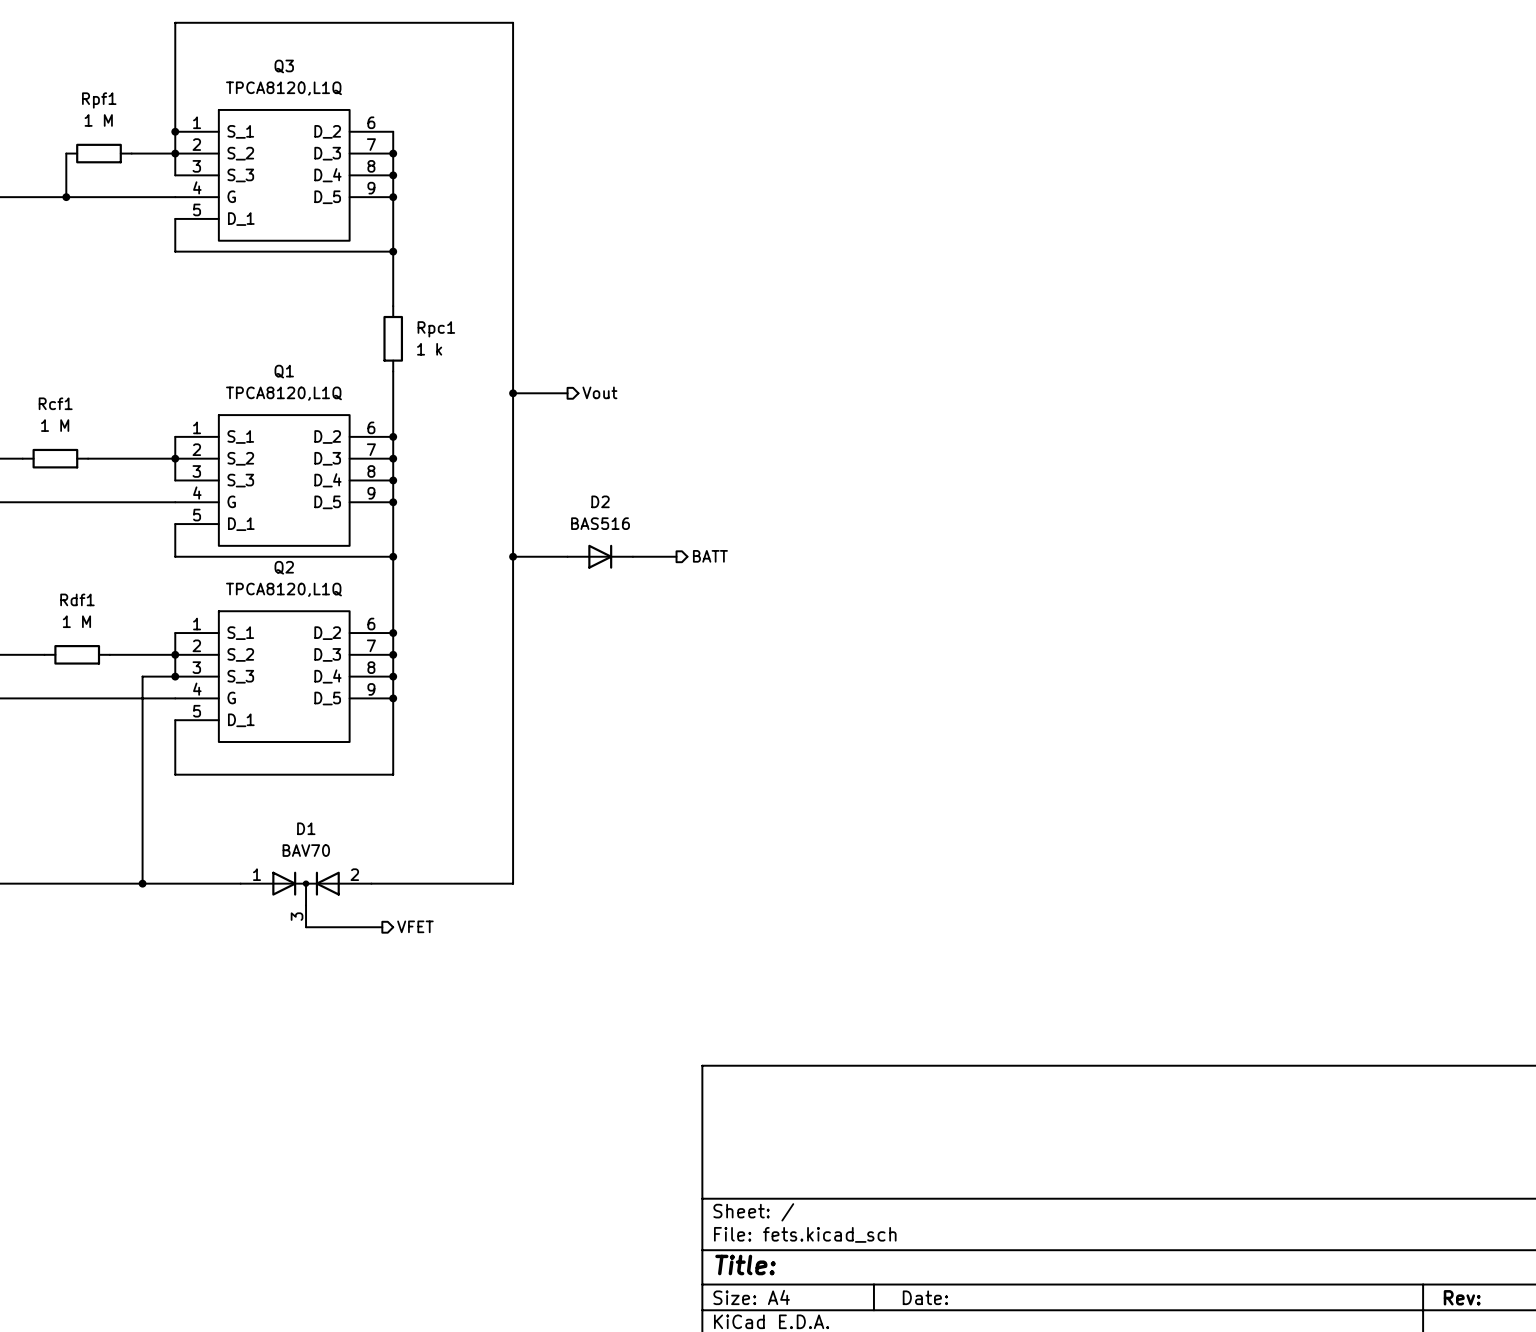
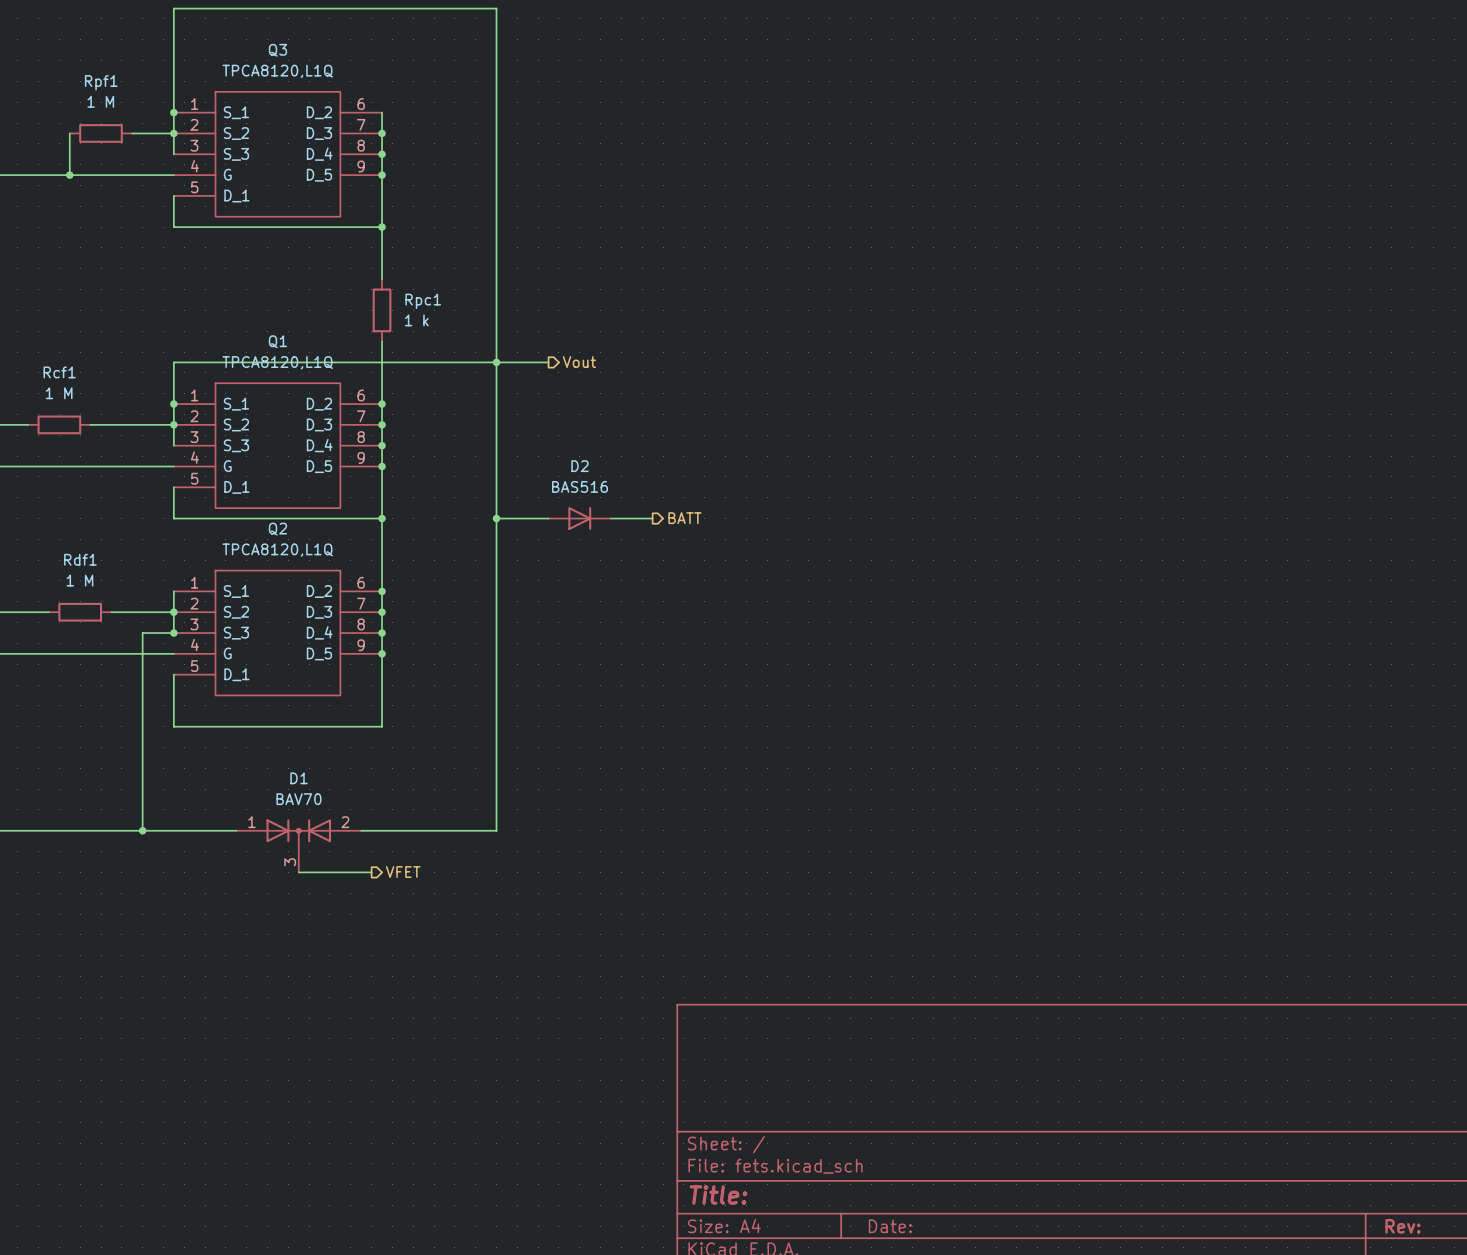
wire: none -> (496, 362) (173, 362) (173, 404)
junction: none -> (173, 404)

